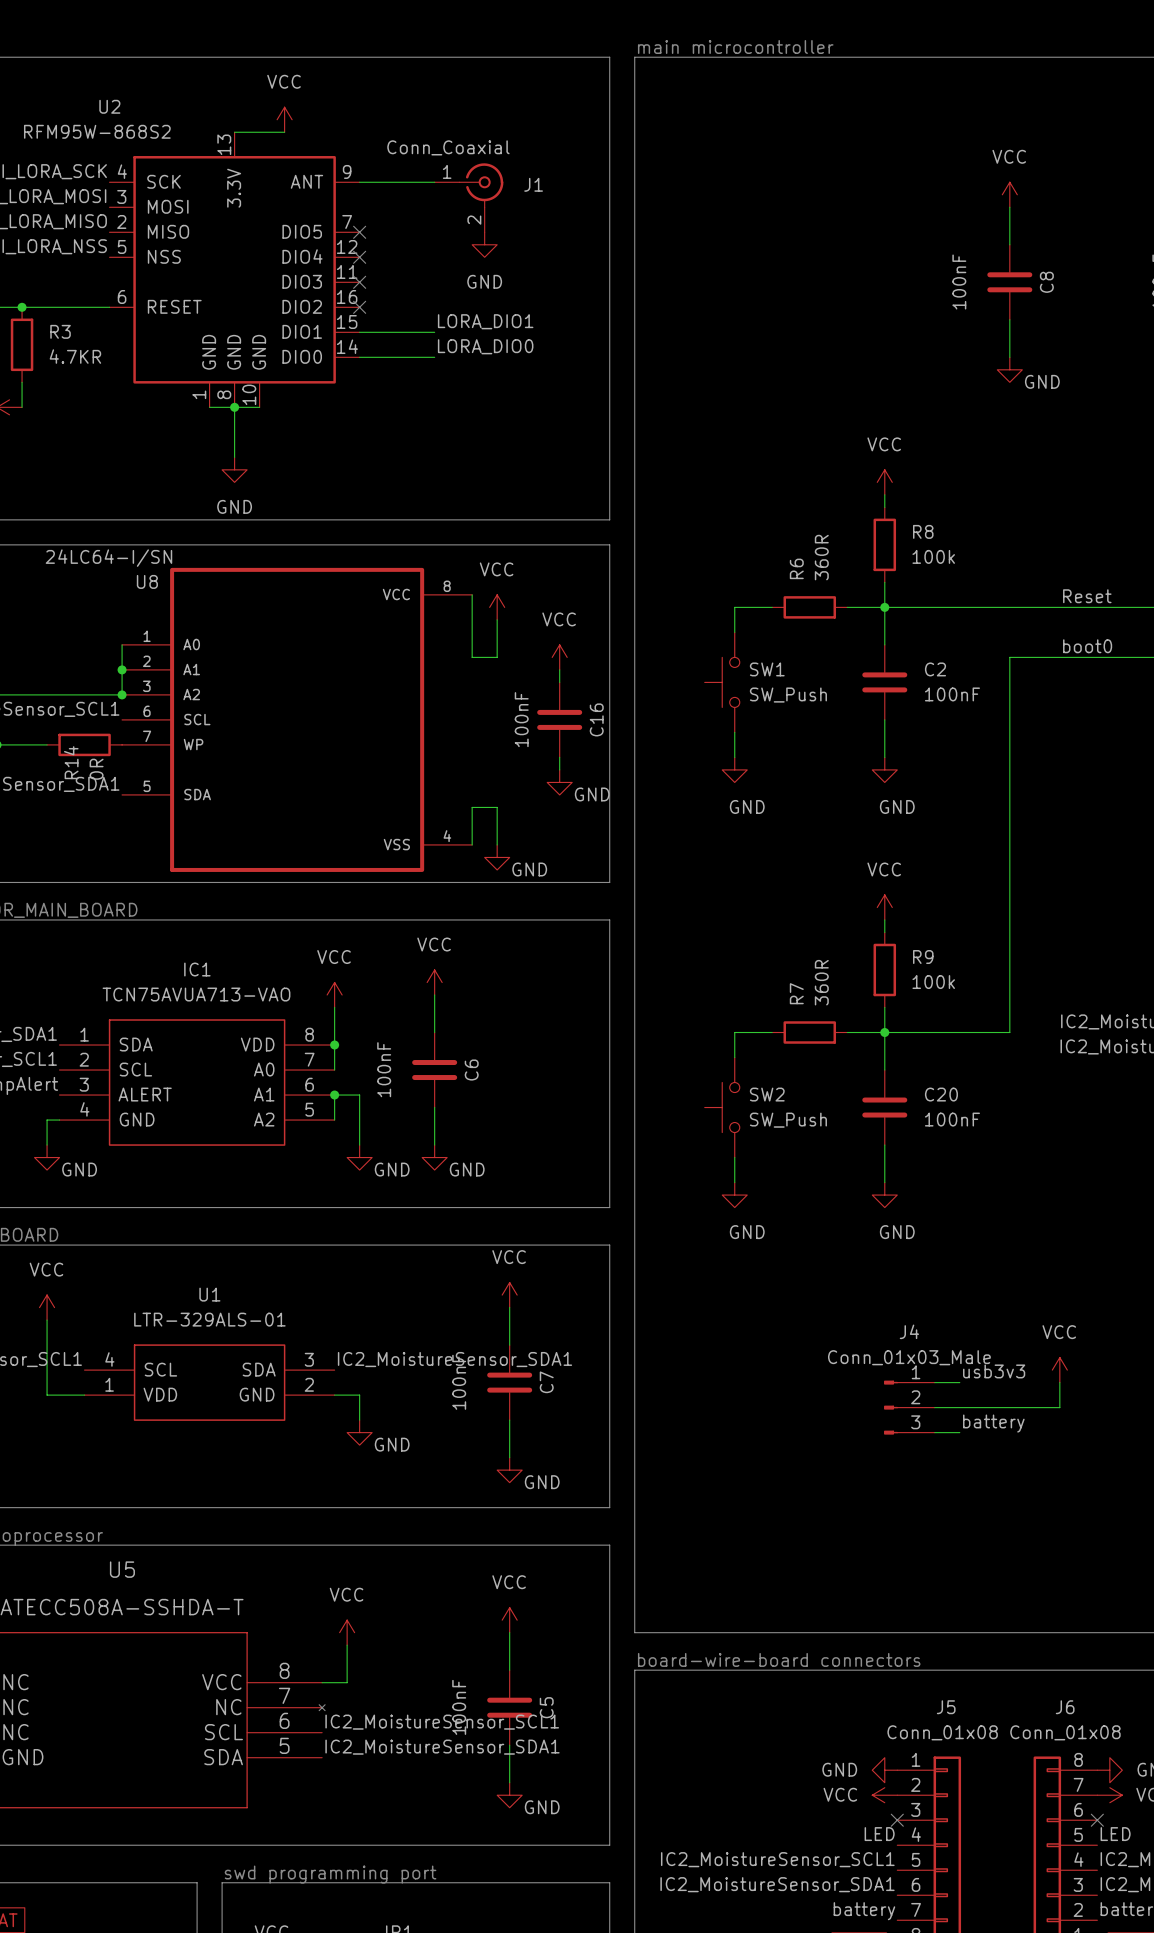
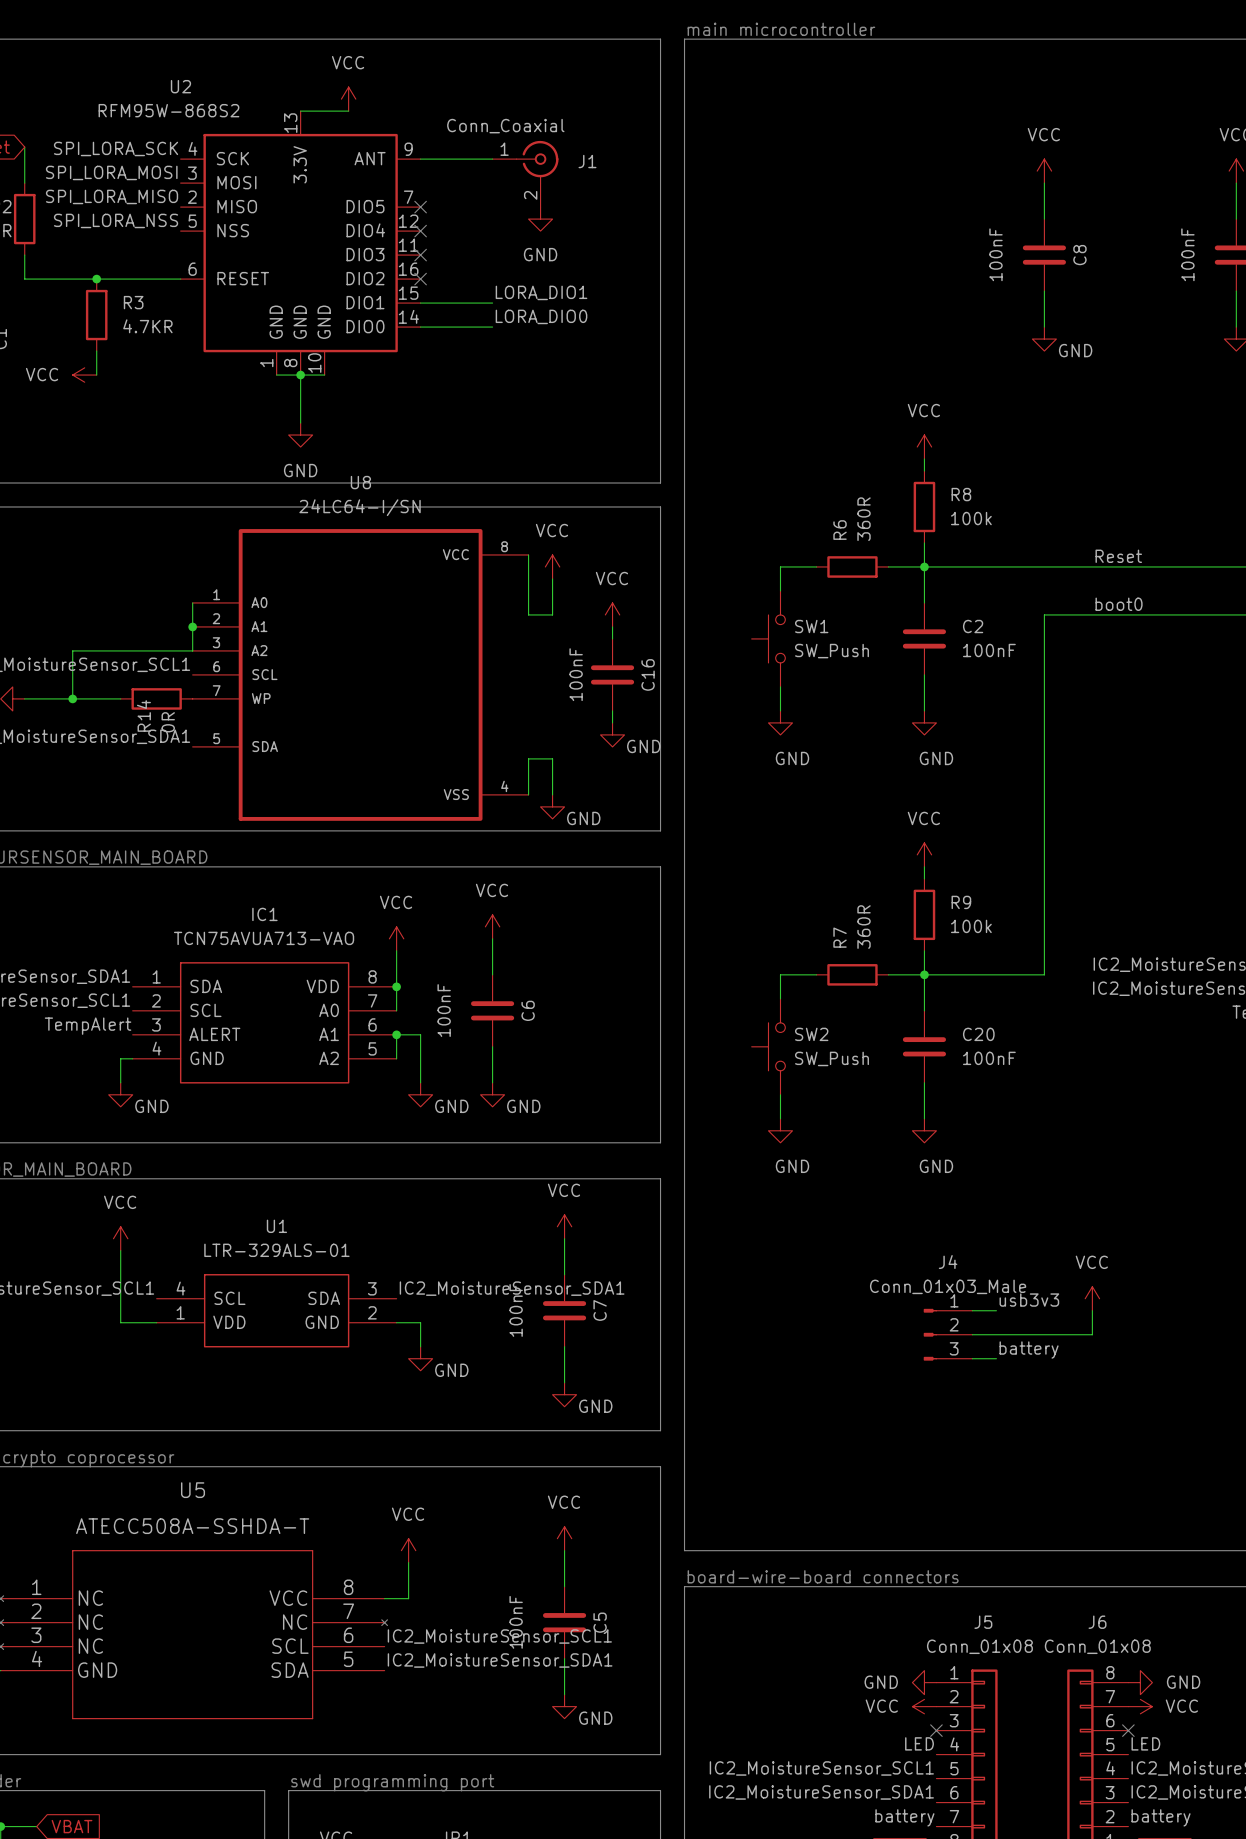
U8 value position: 24LC64-I/SN (108, 558) -> 24LC64-I/SN (360, 507)
U8 name position: U8 (147, 581) -> U8 (360, 482)
junction: (122, 694) -> none

